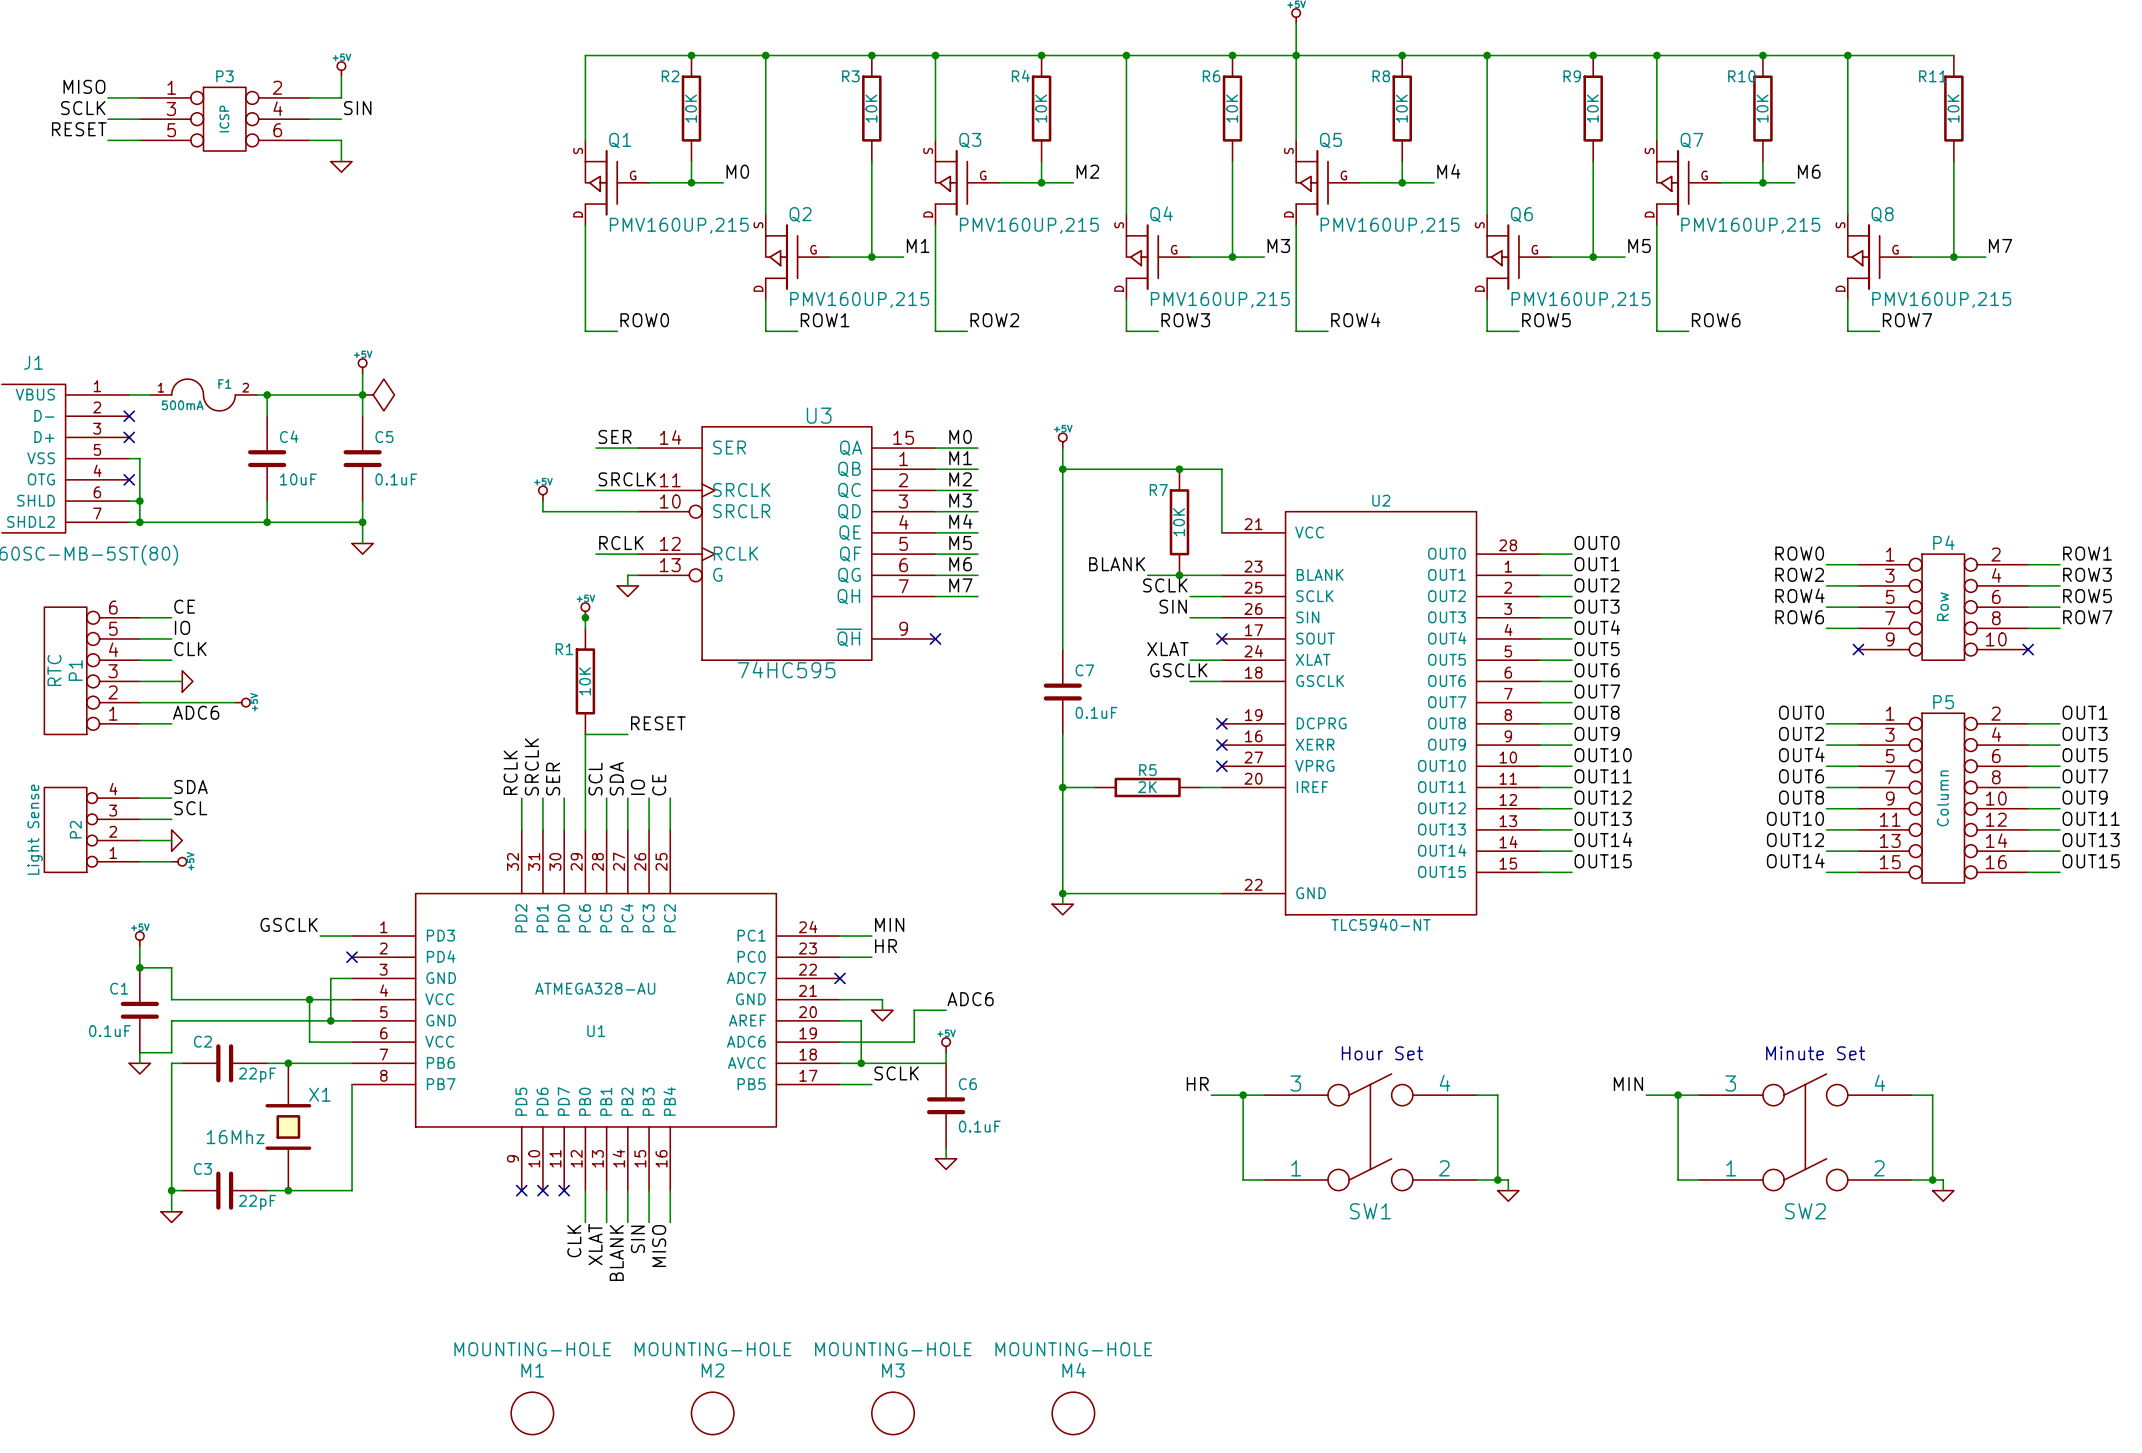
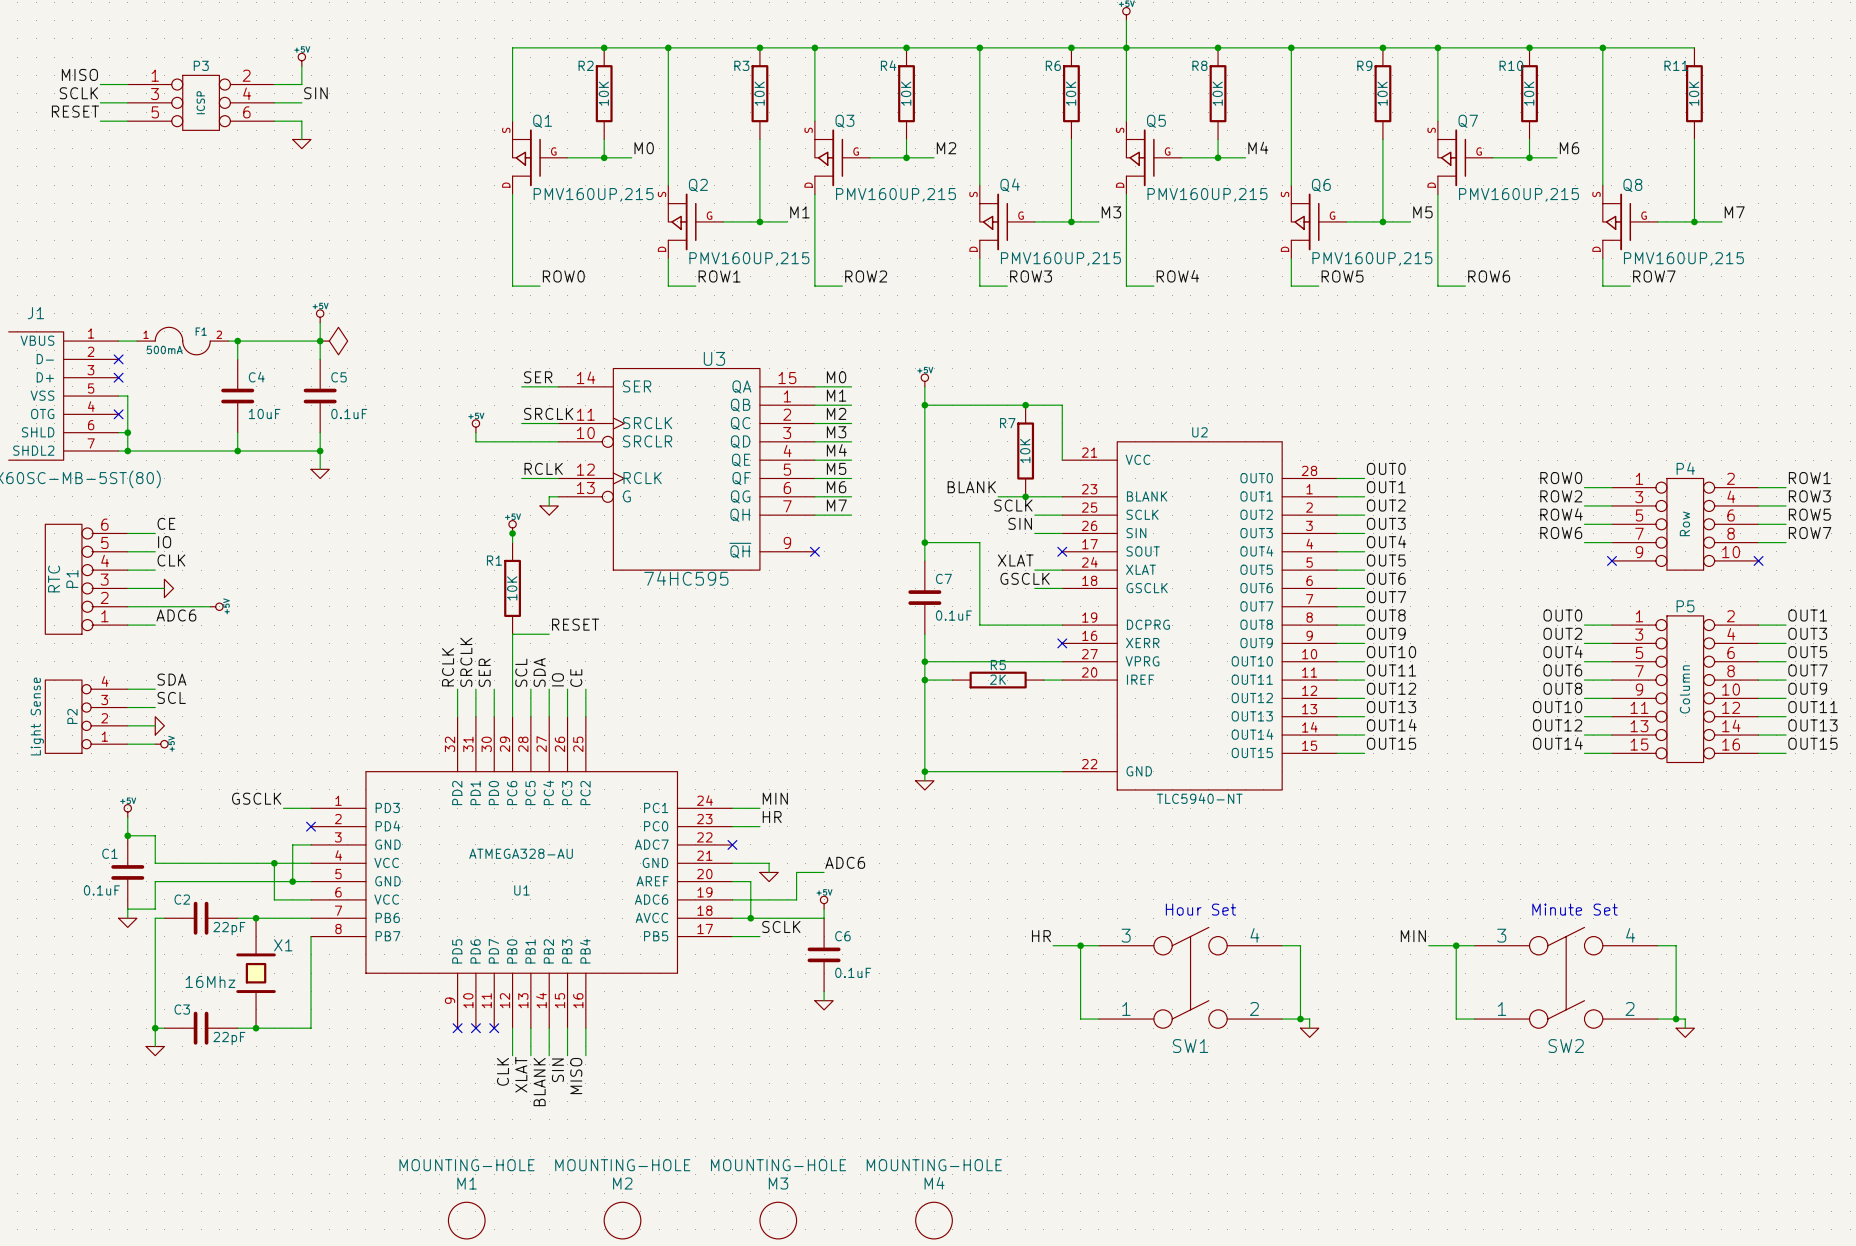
wire: none -> (924, 542) (979, 542) (979, 625) (1062, 625)
junction: none -> (924, 542)
no-connect mark: (1221, 723) -> none
wire: none -> (924, 661) (1062, 661)
junction: none -> (924, 661)
no-connect mark: (1221, 766) -> none

